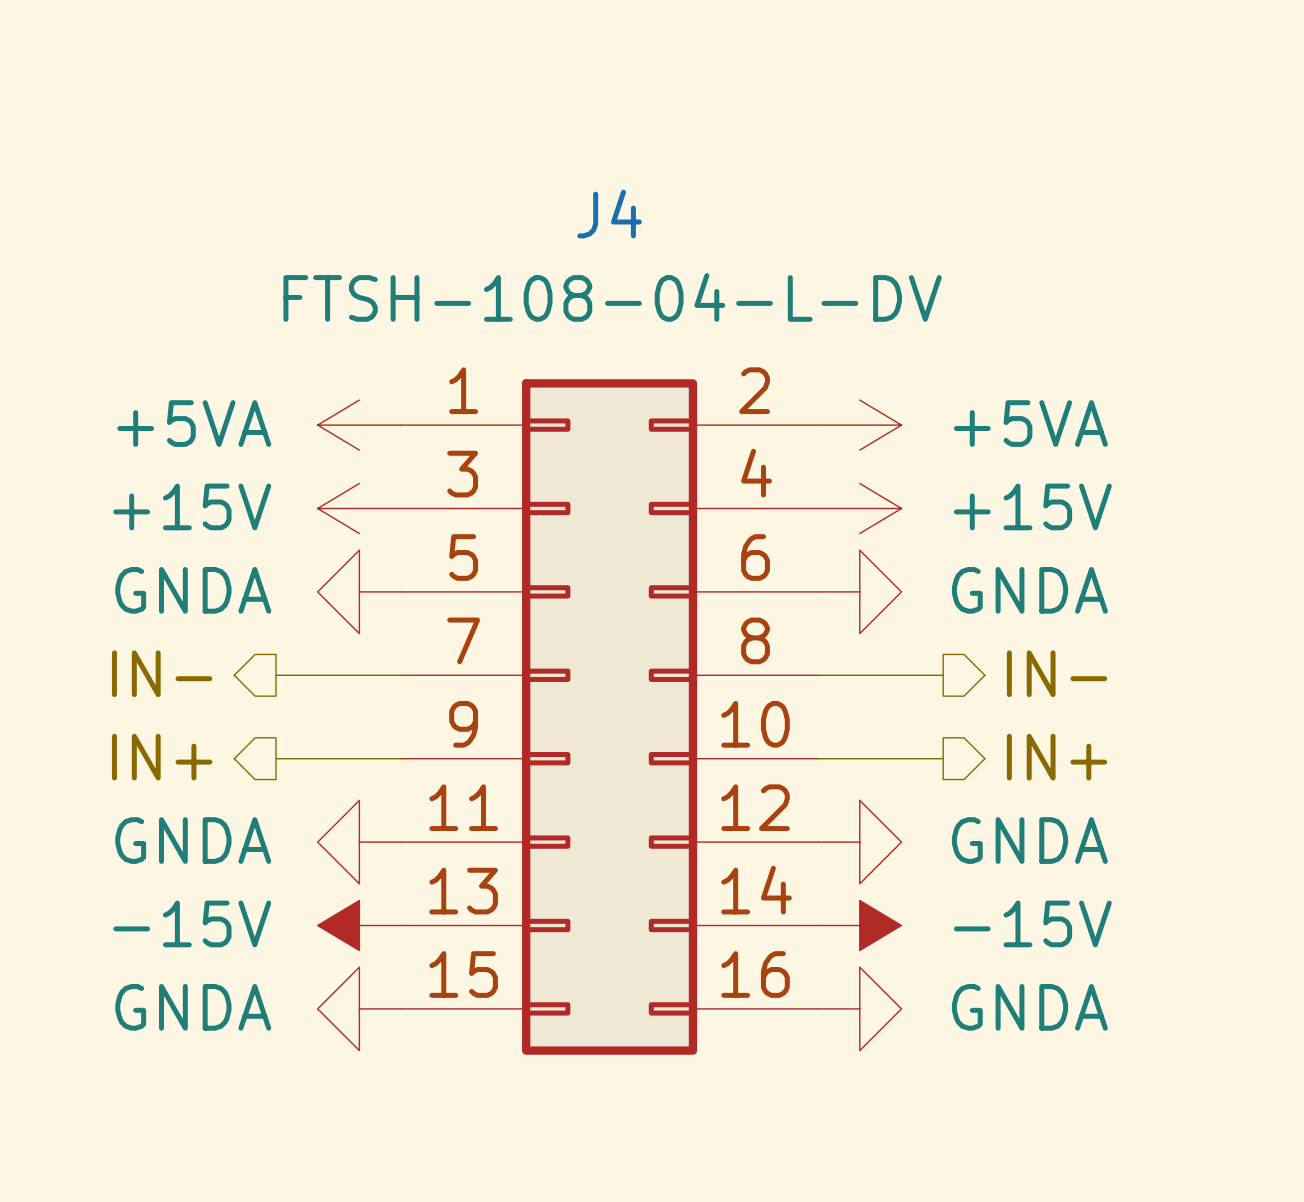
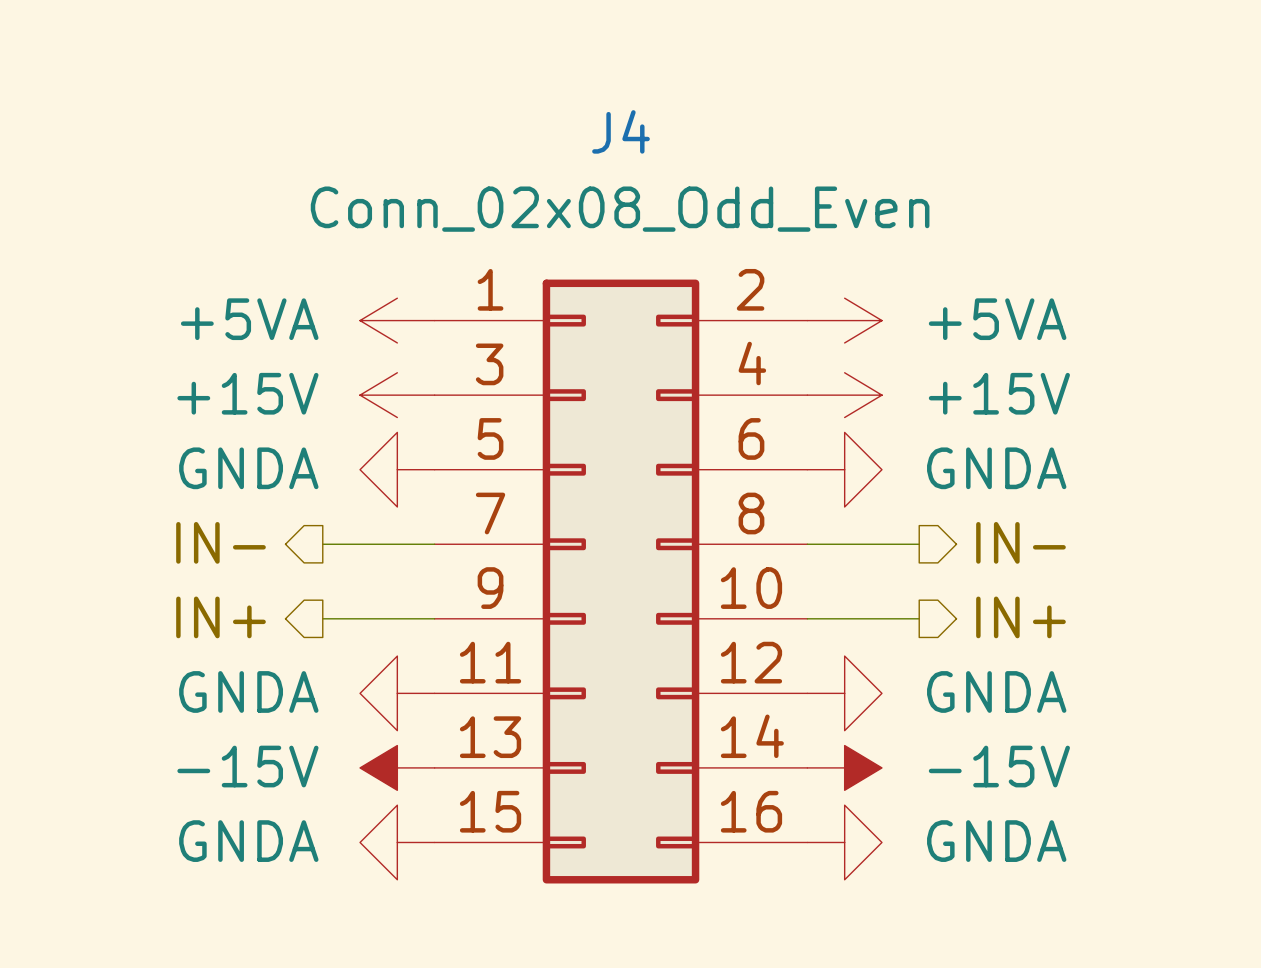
J4 value: FTSH-108-04-L-DV (612, 297) -> Conn_02x08_Odd_Even (620, 209)

